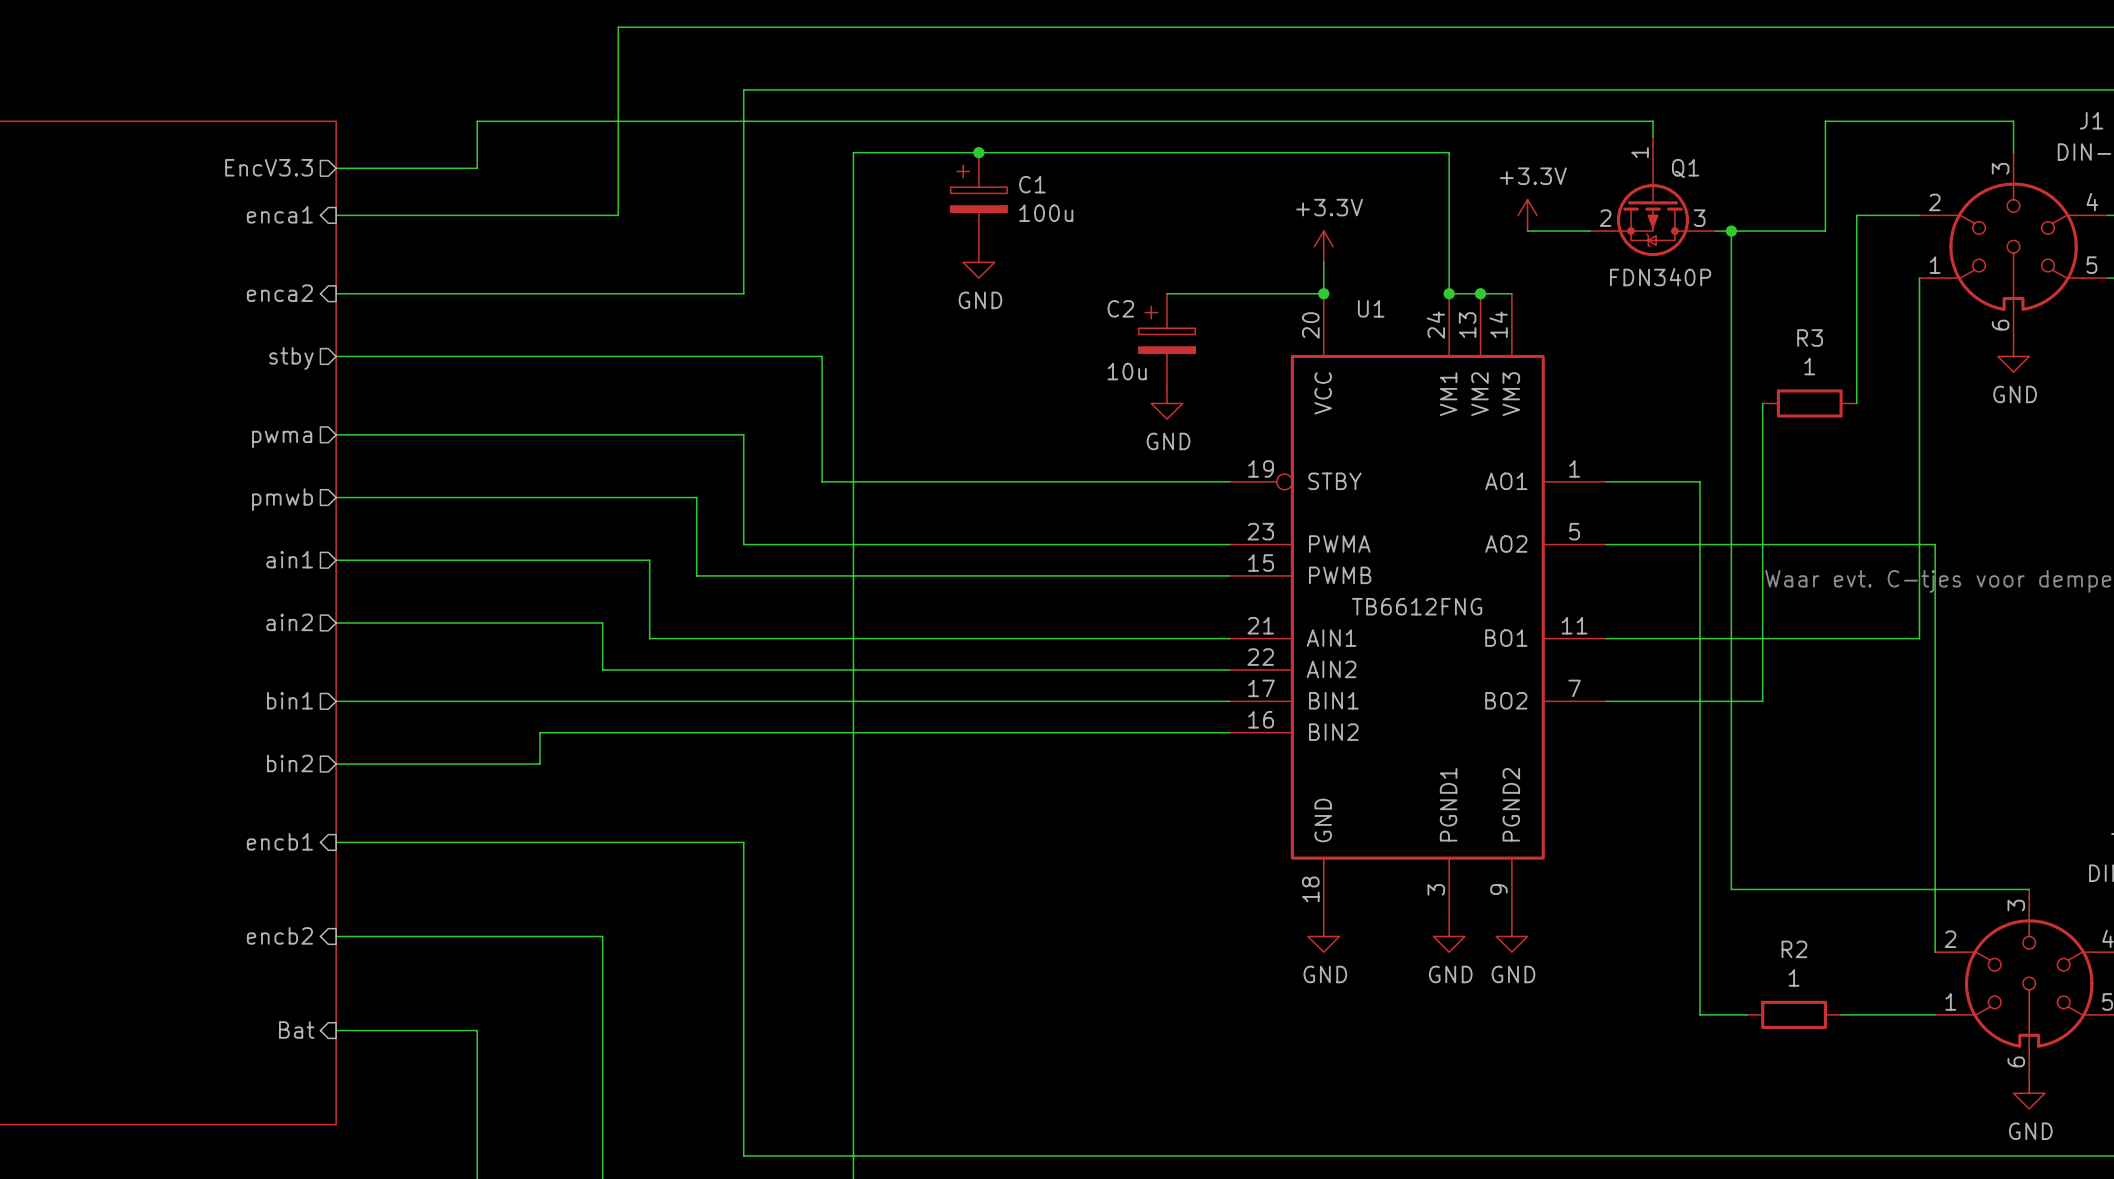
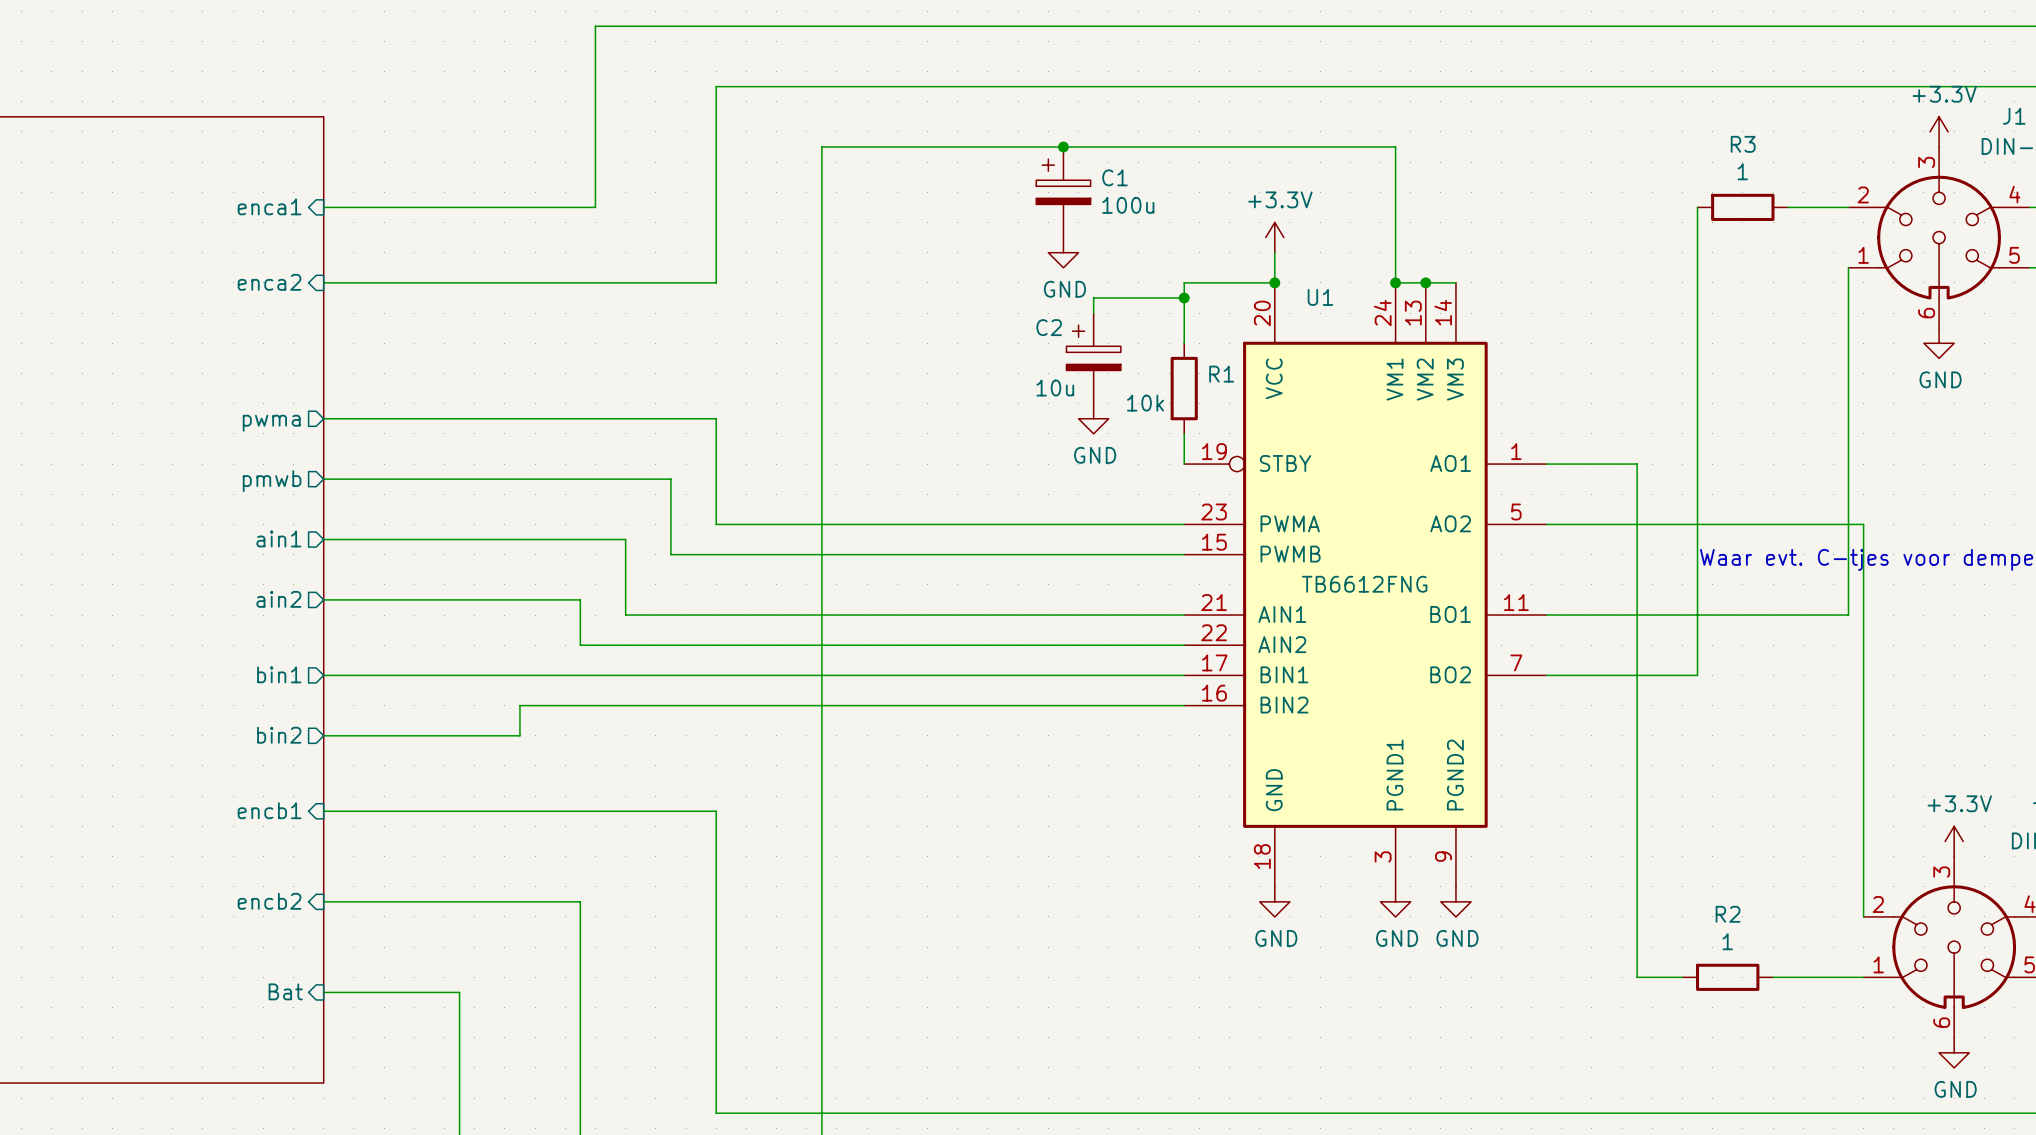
wire: (1652, 136) (1652, 121) (477, 121) (477, 168) (336, 168) -> none
power symbol: none -> +3.3V (1939, 131)
junction: (978, 152) -> none
junction: none -> (1063, 147)
wire: (2013, 152) (2013, 121) (1825, 121) (1825, 231) (1715, 231) -> none
sheet pin: EncV3.3 (269, 167) -> none
Q1: FDN340P (1652, 196) -> none
C1 position: (978, 199) -> (1063, 192)
power symbol: +3.3V (1527, 215) -> none
wire: (1856, 215) (1856, 403) -> (1697, 207) (1697, 388)
wire: (1527, 231) (1590, 231) -> none
wire: (1731, 231) (1731, 889) (2029, 889) -> none
junction: (1731, 231) -> none
power symbol: GND (978, 262) -> none
power symbol: none -> GND (1063, 252)
wire: (1167, 293) (1229, 293) -> (1184, 343) (1184, 282)
wire: none -> (1184, 297) (1093, 297) (1093, 313)
junction: none -> (1184, 297)
C2 position: (1167, 340) -> (1093, 358)
wire: (336, 356) (822, 356) (822, 481) (1229, 481) -> (1184, 433) (1184, 464)
sheet pin: stby (291, 358) -> none
power symbol position: GND (1167, 403) -> GND (1093, 418)
R1: none -> 10k (1184, 388)
R3 position: (1809, 403) -> (1742, 207)
power symbol: none -> +3.3V (1954, 841)

